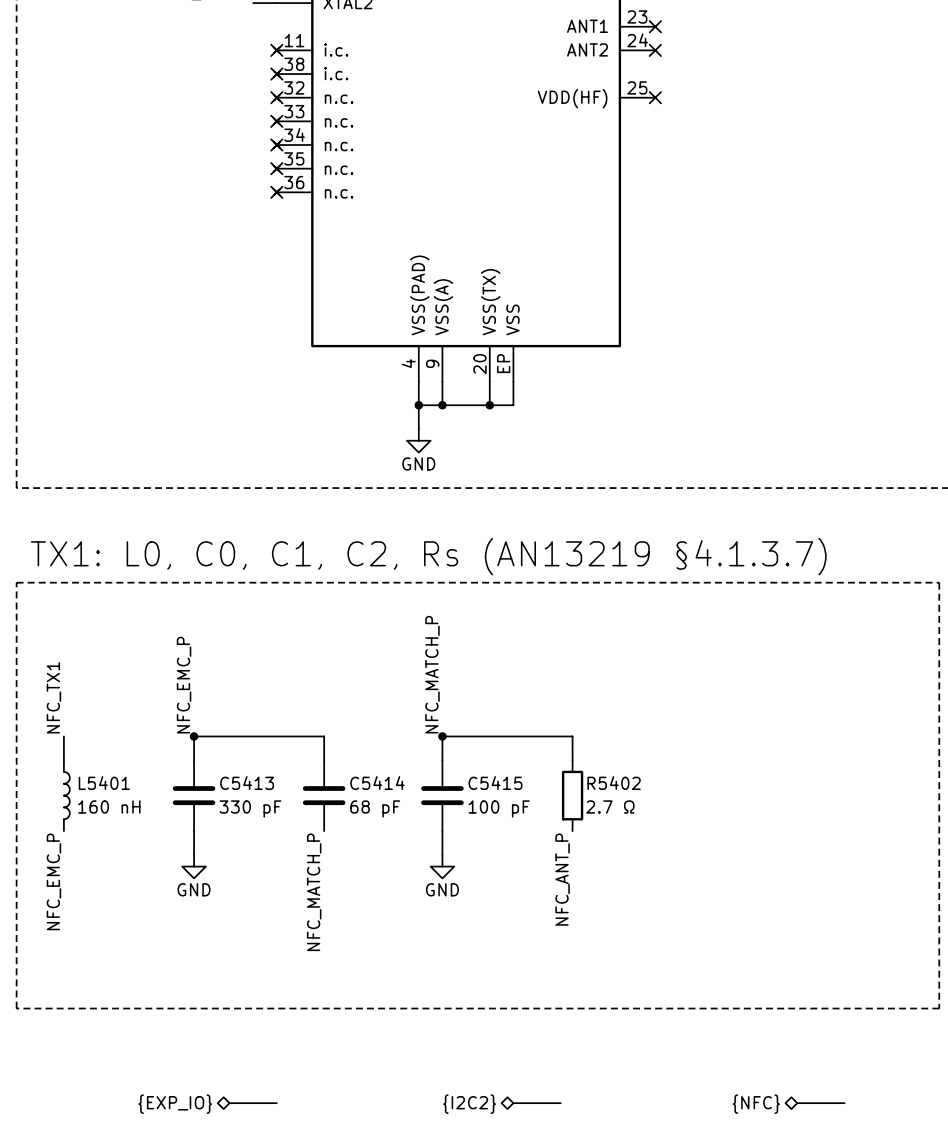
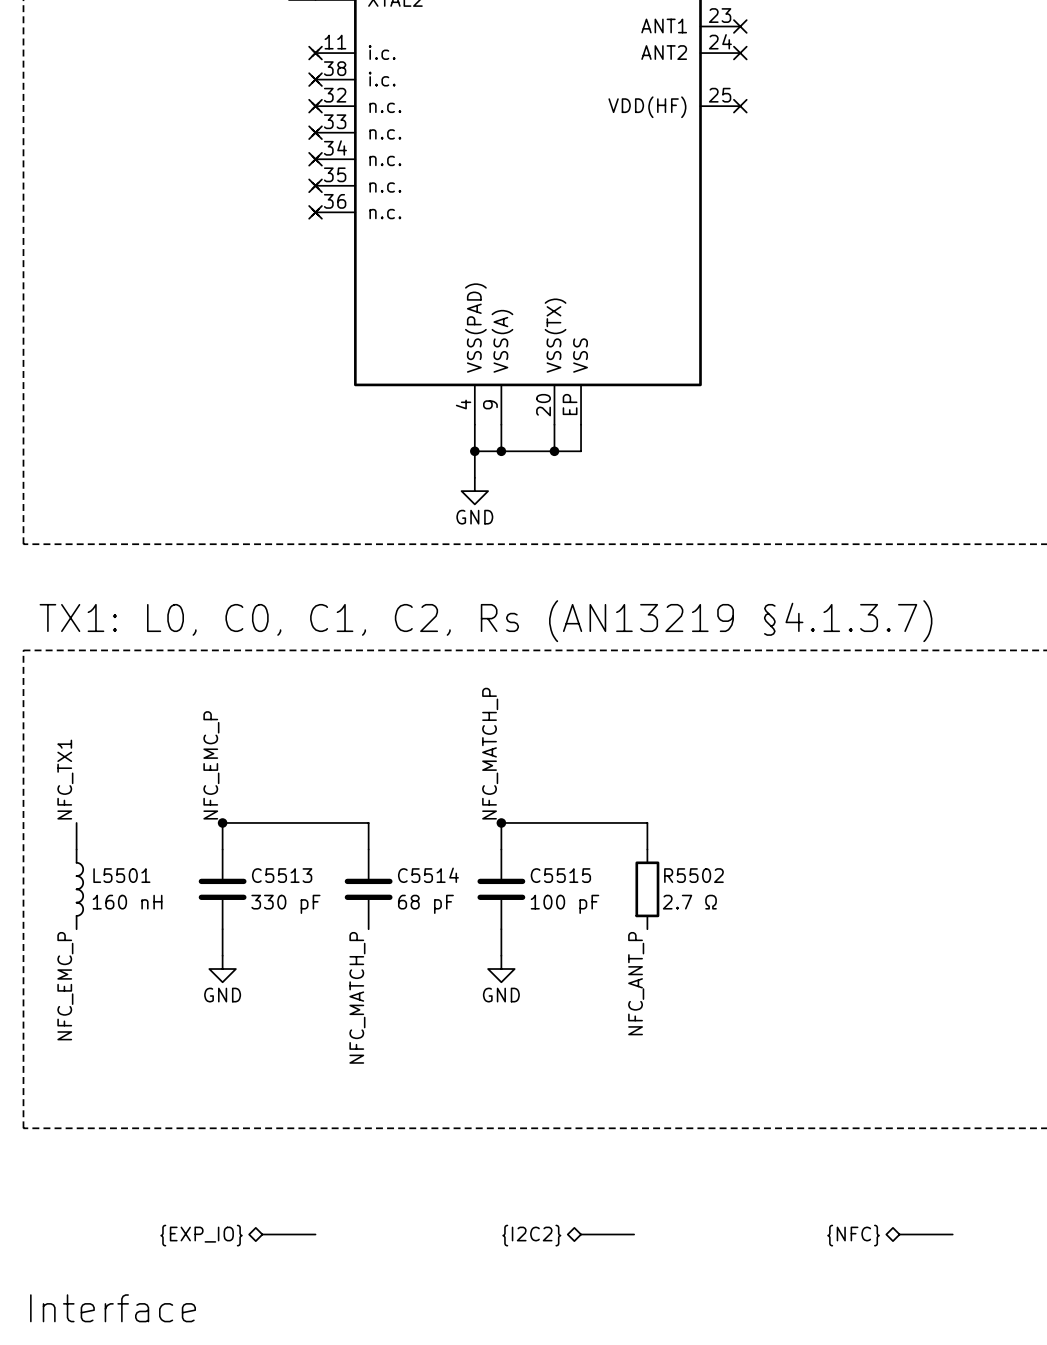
L5401 name: L5401 (104, 783) -> L5501 (121, 875)
C5413 name: C5413 (247, 783) -> C5513 (282, 875)
C5414 name: C5414 (377, 783) -> C5514 (428, 875)
C5415 name: C5415 (495, 783) -> C5515 (560, 875)
R5402 name: R5402 (614, 783) -> R5502 (693, 875)

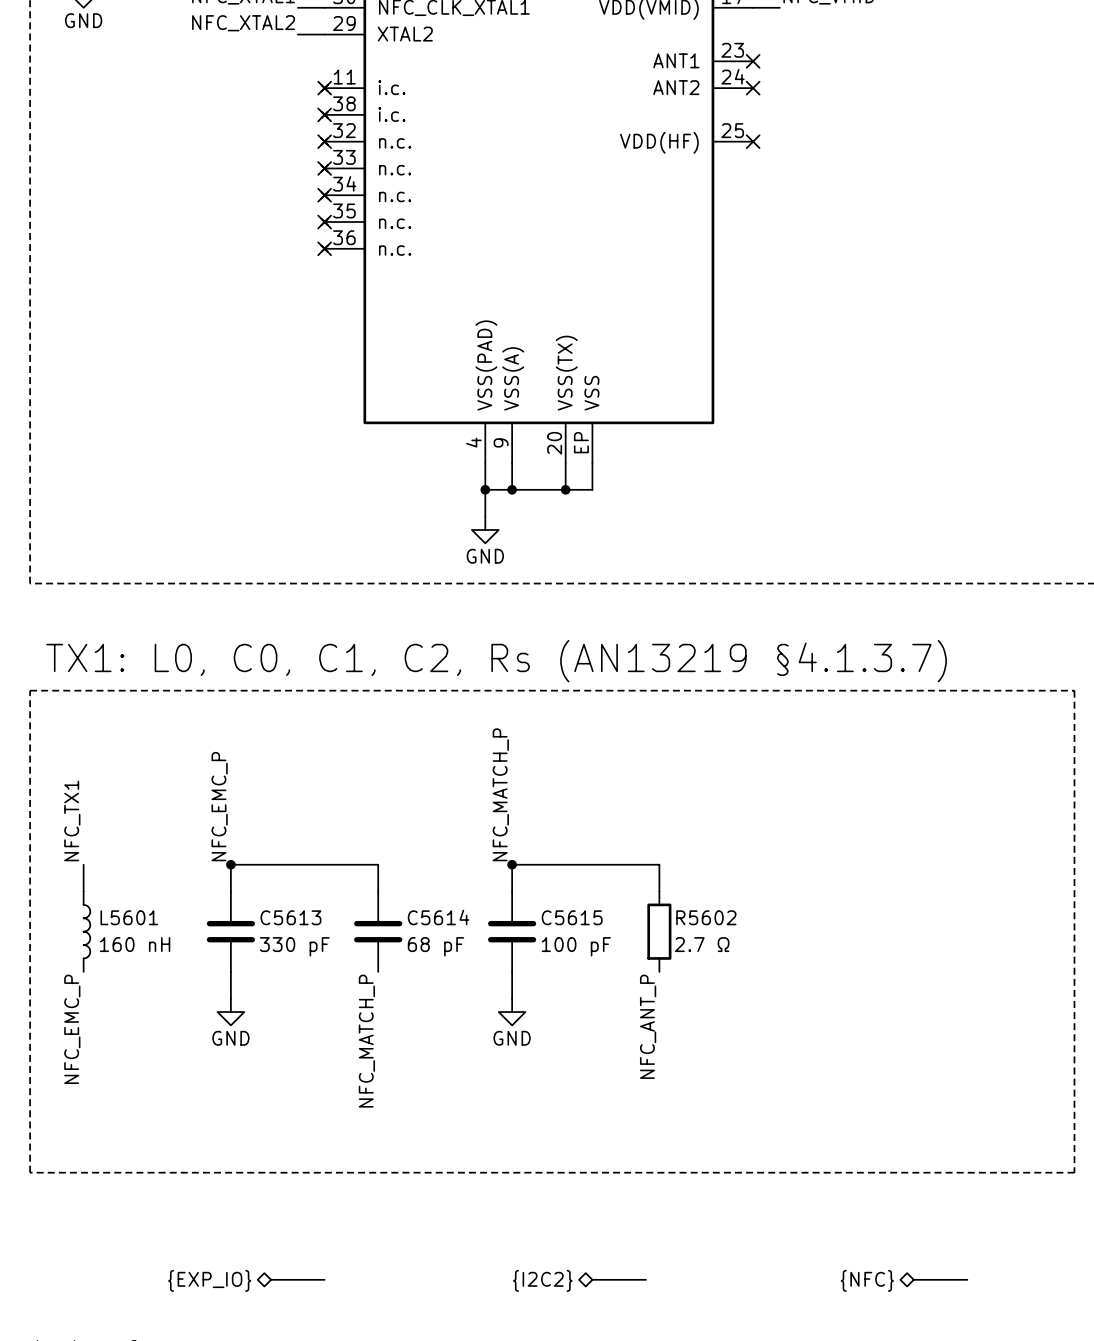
L5501 name: L5501 (121, 875) -> L5601 (129, 917)
C5513 name: C5513 (282, 875) -> C5613 (290, 917)
C5514 name: C5514 (428, 875) -> C5614 (438, 917)
C5515 name: C5515 (560, 875) -> C5615 (572, 917)
R5502 name: R5502 (693, 875) -> R5602 (706, 917)

